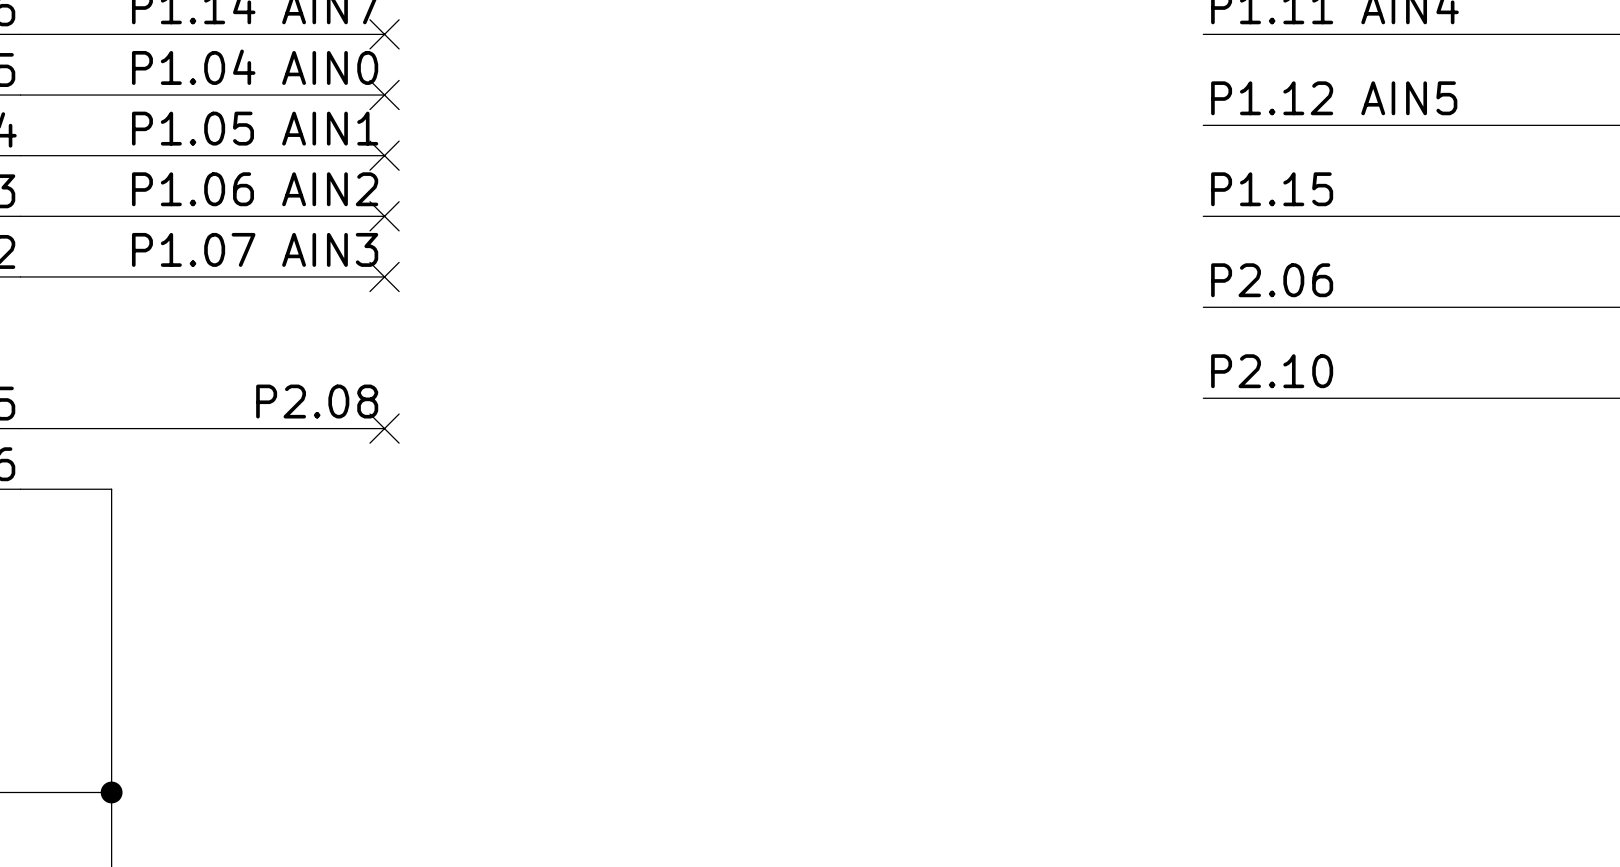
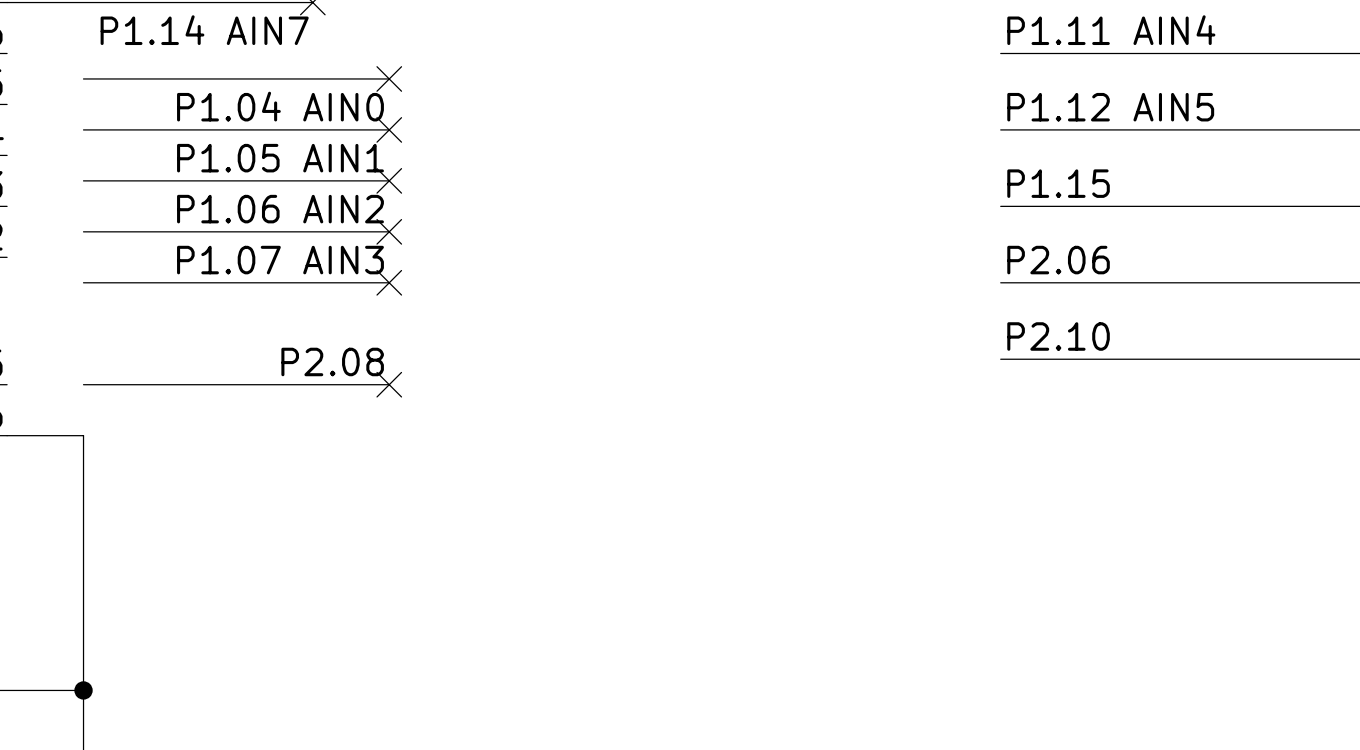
wire: (20, 34) (384, 34) -> (83, 78) (389, 78)
no-connect mark: (384, 34) -> none
no-connect mark: none -> (389, 78)
label position: P1.04 AIN0 (255, 67) -> P1.04 AIN0 (280, 106)
wire: (20, 95) (384, 95) -> (83, 129) (389, 129)
no-connect mark: (384, 95) -> none
no-connect mark: none -> (389, 129)
label position: P1.05 AIN1 (255, 128) -> P1.05 AIN1 (280, 158)
wire: (20, 155) (384, 155) -> (83, 180) (389, 180)
no-connect mark: (384, 155) -> none
no-connect mark: none -> (389, 180)
label position: P1.06 AIN2 (255, 189) -> P1.06 AIN2 (280, 209)
wire: (20, 216) (384, 216) -> (83, 231) (389, 231)
no-connect mark: (384, 216) -> none
no-connect mark: none -> (389, 231)
label position: P1.07 AIN3 (255, 249) -> P1.07 AIN3 (280, 260)
wire: (20, 276) (384, 276) -> (83, 282) (389, 282)
no-connect mark: (384, 276) -> none
no-connect mark: none -> (389, 282)
label position: P2.08 (317, 401) -> P2.08 (332, 361)
wire: (20, 428) (111, 428) -> (312, 384) (389, 384)
no-connect mark: (384, 428) -> none
no-connect mark: none -> (389, 384)

